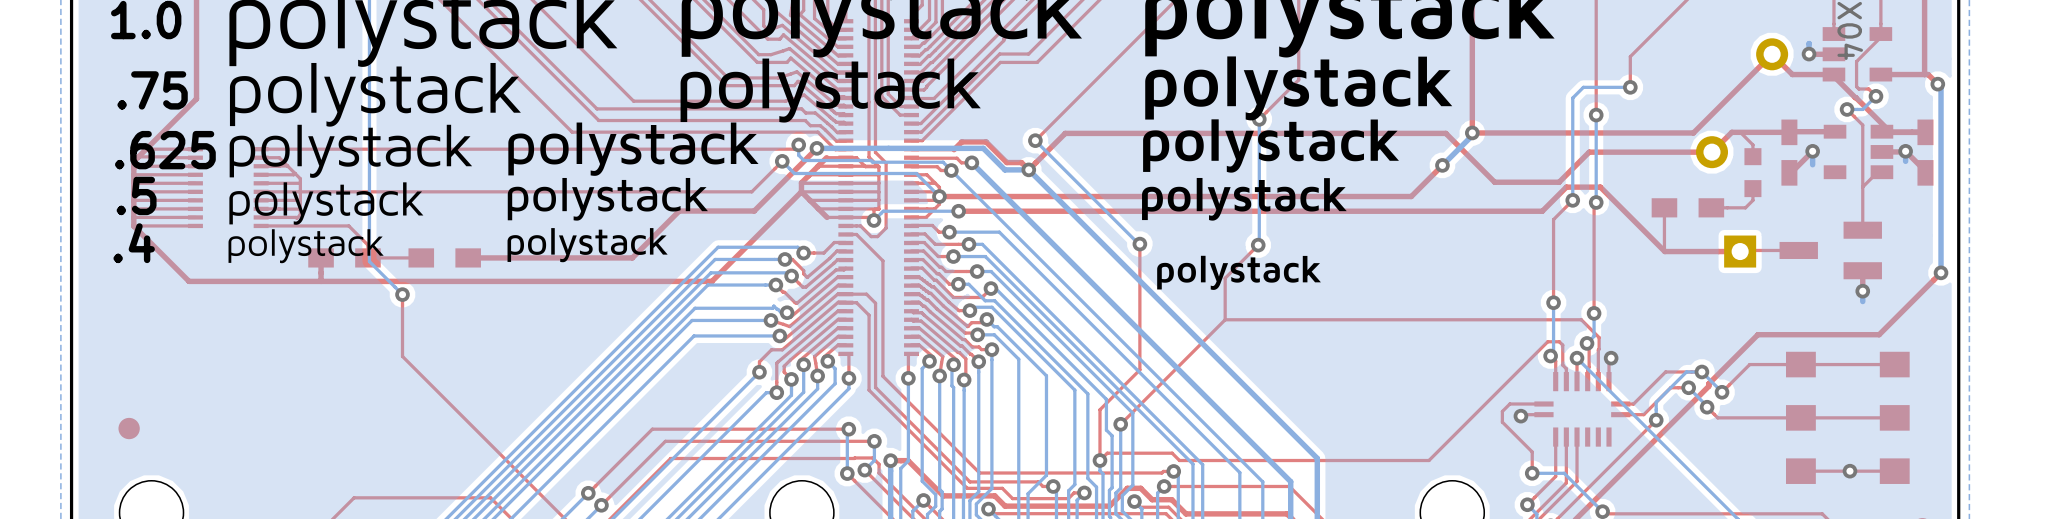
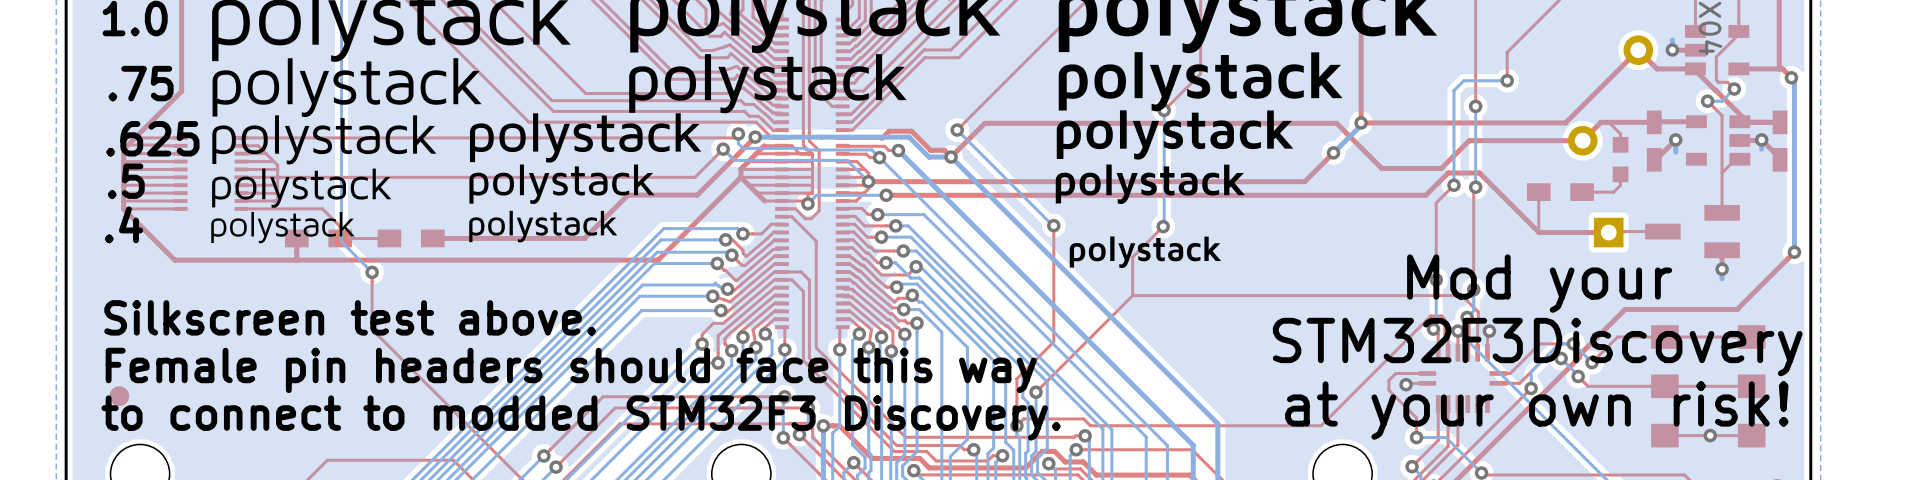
text: none -> Mod your (1539, 283)
text: none -> Silkscreen test above. (350, 317)
text: none -> STM32F3Discovery (1537, 347)
text: none -> Female pin headers should face this way (571, 370)
text: none -> at your own risk! (1536, 410)
text: none -> to connect to modded STM32F3 Discovery. (581, 418)

